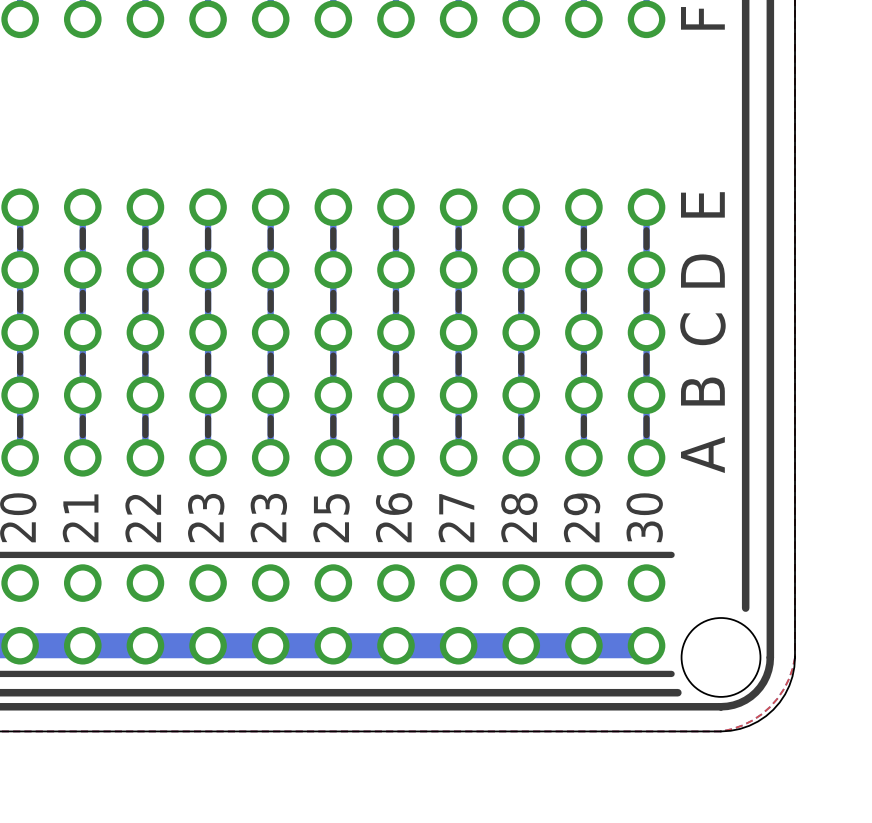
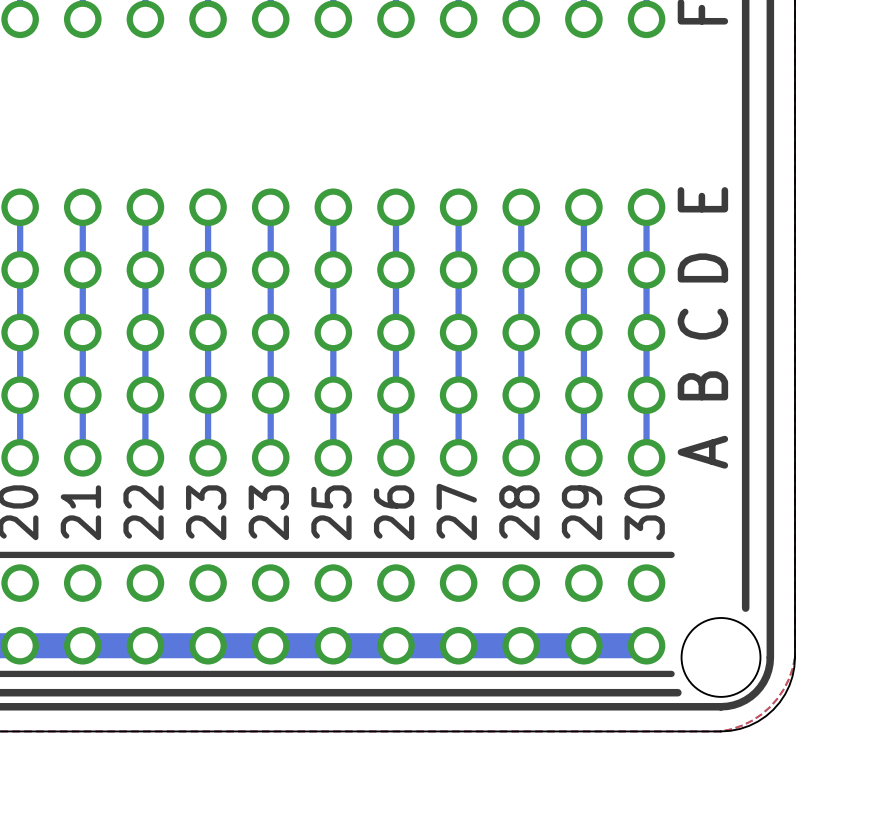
line: (20, 230) (20, 247) -> none
line: (82, 230) (82, 247) -> none
line: (145, 230) (145, 247) -> none
line: (208, 230) (208, 247) -> none
line: (270, 230) (270, 247) -> none
line: (333, 230) (333, 247) -> none
line: (395, 230) (395, 247) -> none
line: (458, 230) (458, 247) -> none
line: (521, 230) (521, 247) -> none
line: (583, 230) (583, 247) -> none
line: (646, 230) (646, 247) -> none
line: (20, 292) (20, 309) -> none
line: (82, 292) (82, 309) -> none
line: (145, 292) (145, 309) -> none
line: (208, 292) (208, 309) -> none
line: (270, 292) (270, 309) -> none
line: (333, 292) (333, 309) -> none
line: (395, 292) (395, 309) -> none
line: (458, 292) (458, 309) -> none
line: (521, 292) (521, 309) -> none
line: (583, 292) (583, 309) -> none
line: (646, 292) (646, 309) -> none
line: (20, 355) (20, 372) -> none
line: (82, 355) (82, 372) -> none
line: (145, 355) (145, 372) -> none
line: (208, 355) (208, 372) -> none
line: (270, 355) (270, 372) -> none
line: (333, 355) (333, 372) -> none
line: (395, 355) (395, 372) -> none
line: (458, 355) (458, 372) -> none
line: (521, 355) (521, 372) -> none
line: (583, 355) (583, 372) -> none
line: (646, 355) (646, 372) -> none
line: (20, 418) (20, 435) -> none
line: (82, 418) (82, 435) -> none
line: (145, 418) (145, 435) -> none
line: (208, 418) (208, 435) -> none
line: (270, 418) (270, 435) -> none
line: (333, 418) (333, 435) -> none
line: (395, 418) (395, 435) -> none
line: (458, 418) (458, 435) -> none
line: (521, 418) (521, 435) -> none
line: (583, 418) (583, 435) -> none
line: (646, 418) (646, 435) -> none

